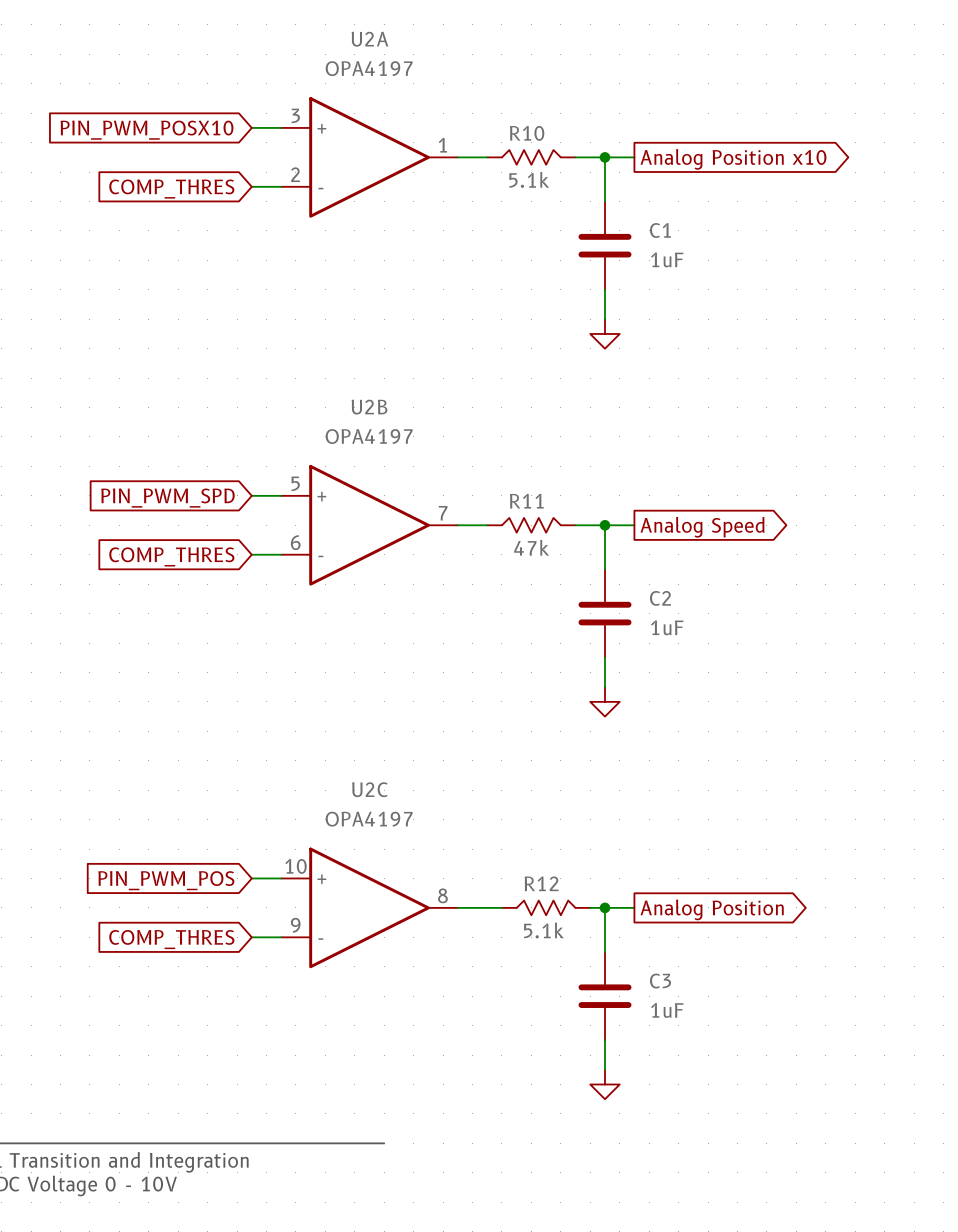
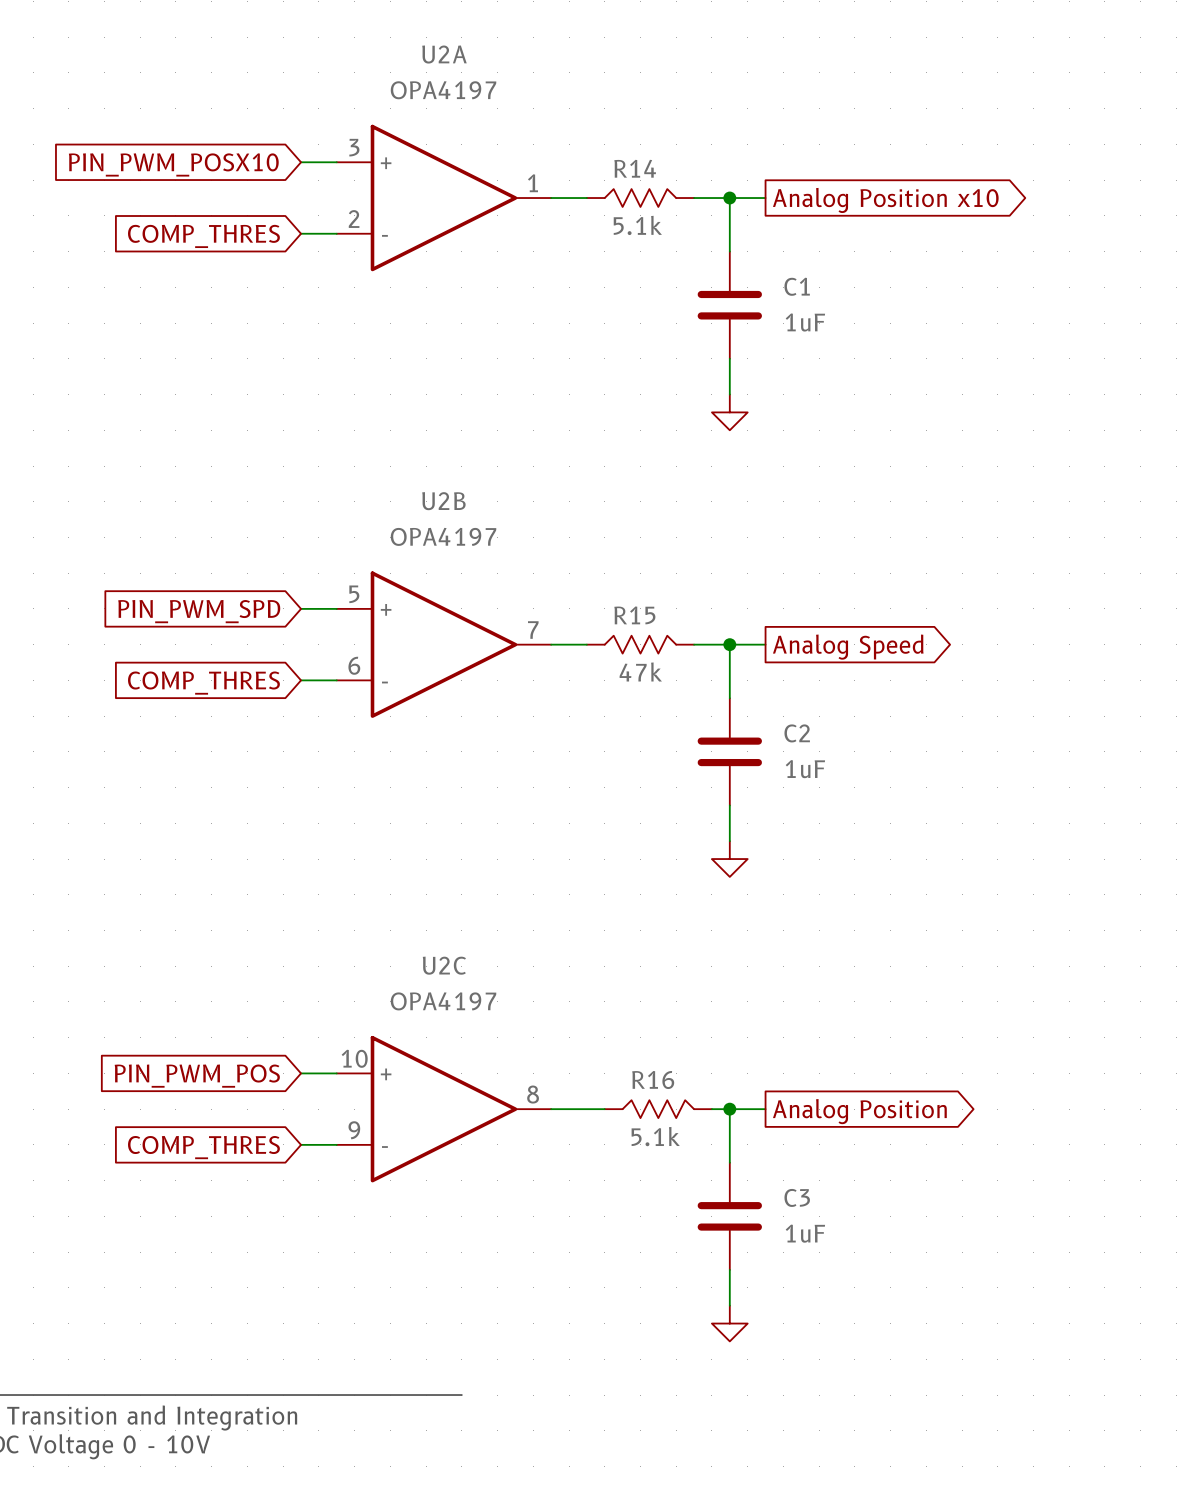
R10 name: R10 (527, 133) -> R14 (635, 168)
R11 name: R11 (526, 501) -> R15 (634, 615)
R12 name: R12 (541, 883) -> R16 (653, 1080)

